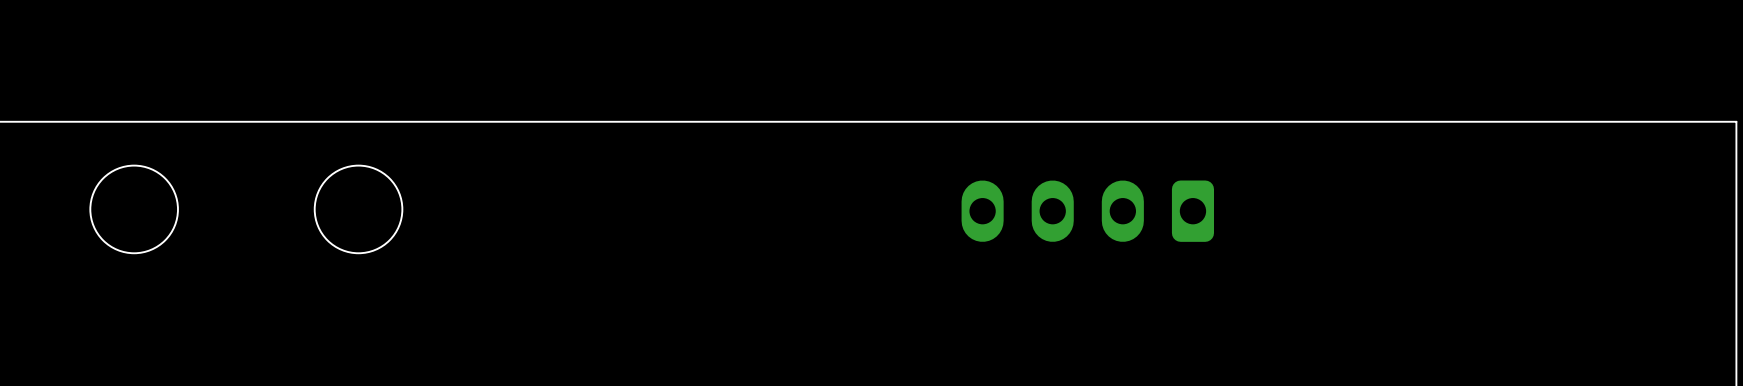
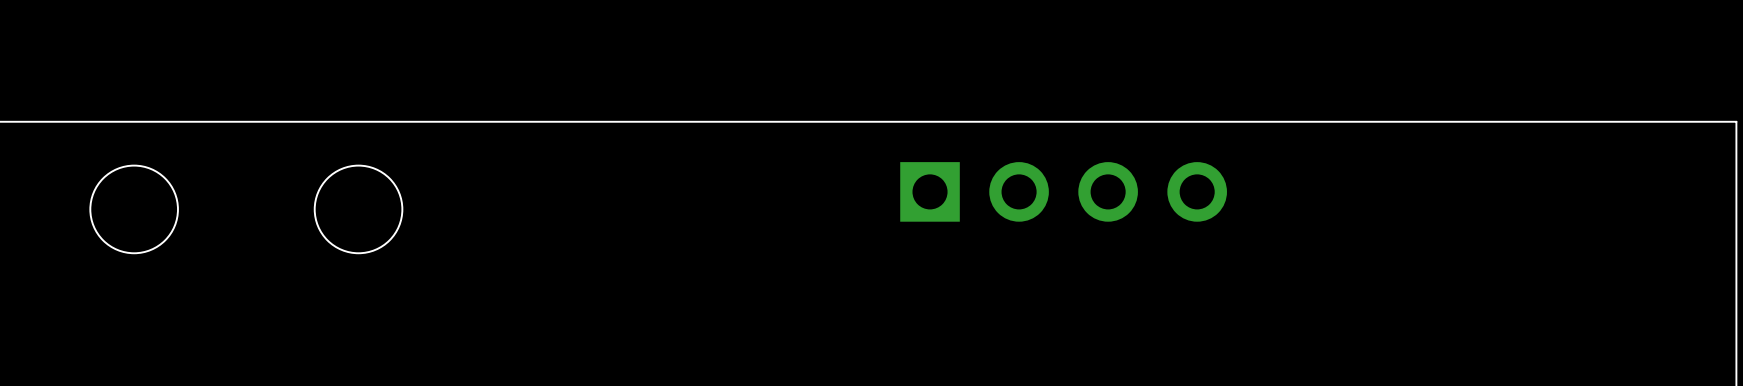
part footprint: [961, 180, 1215, 242] -> [900, 162, 1227, 222]

